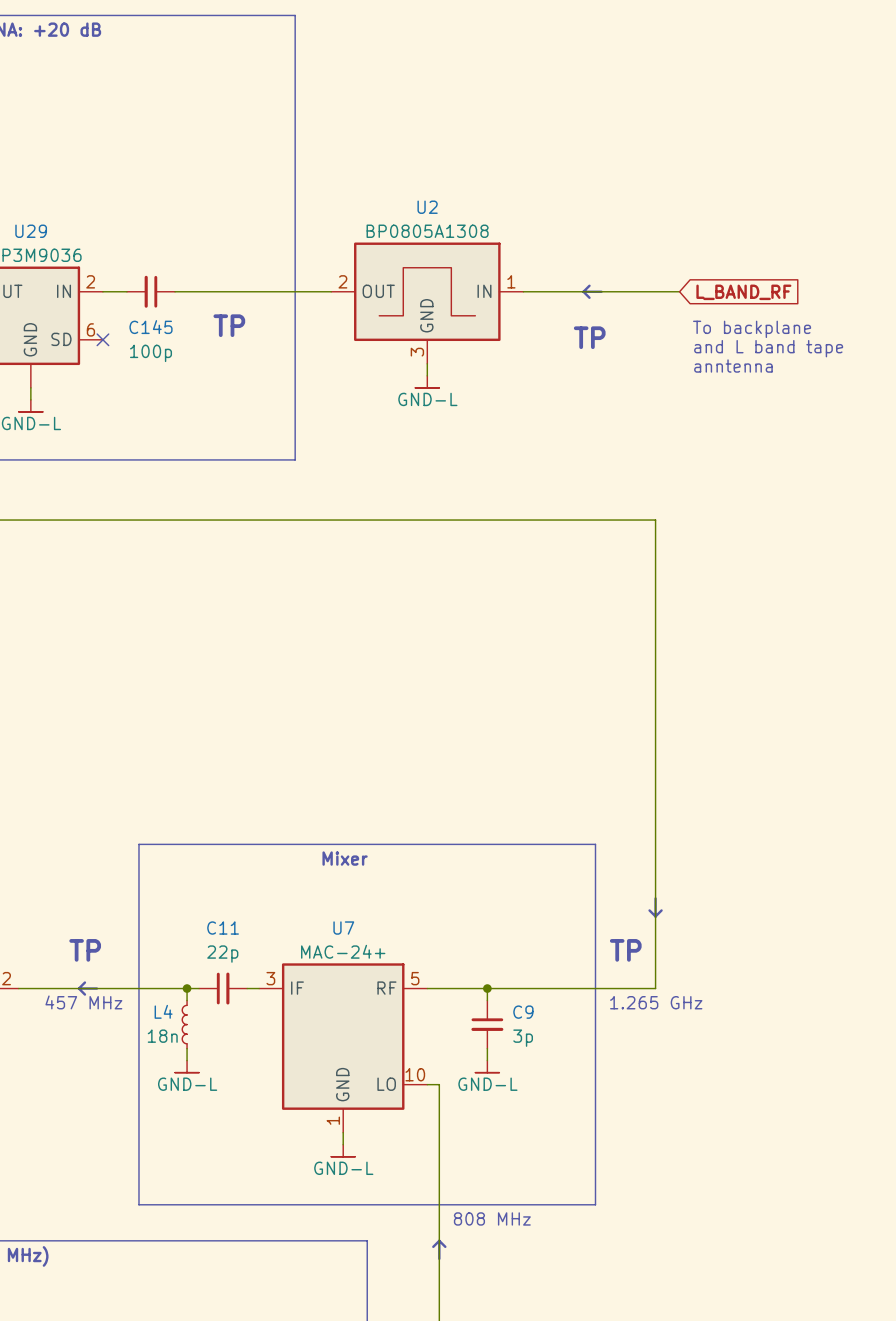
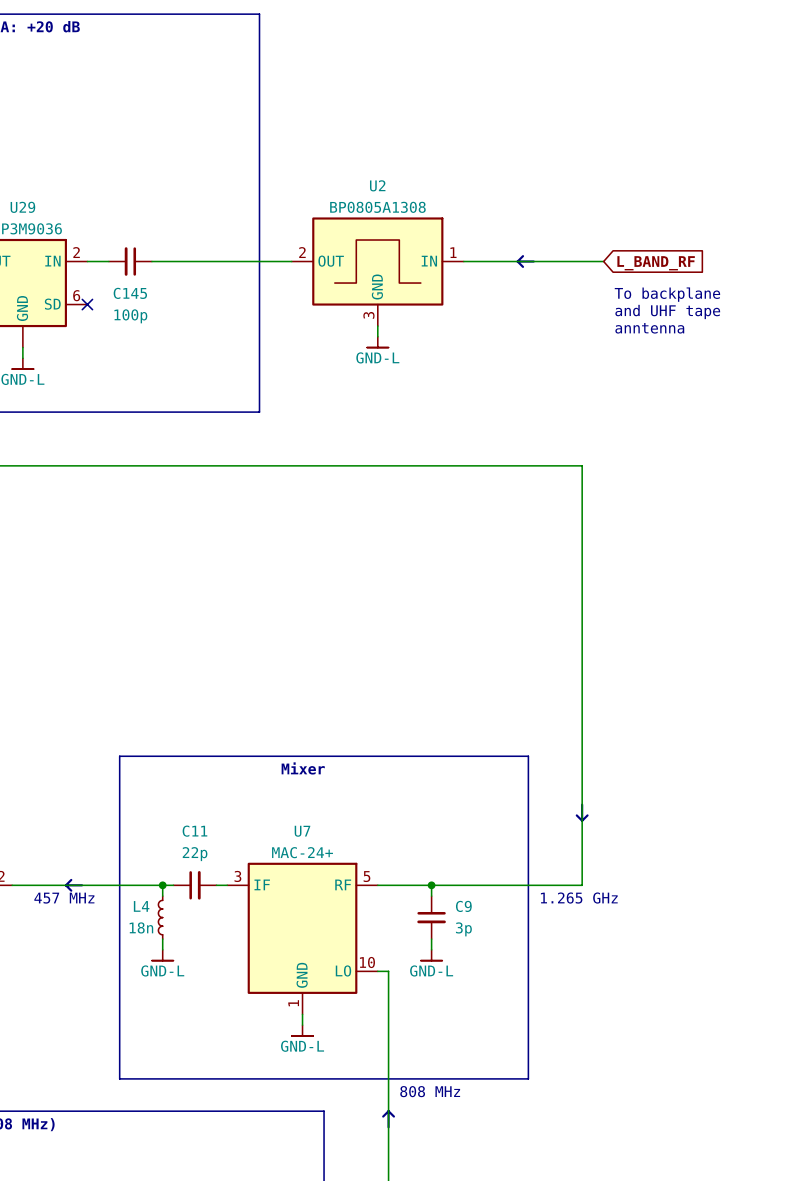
text: TP (229, 325) -> none
text: TP (589, 337) -> none
text: and L band tape (768, 348) -> and UHF tape (667, 311)
text: TP (85, 950) -> none
text: TP (625, 950) -> none

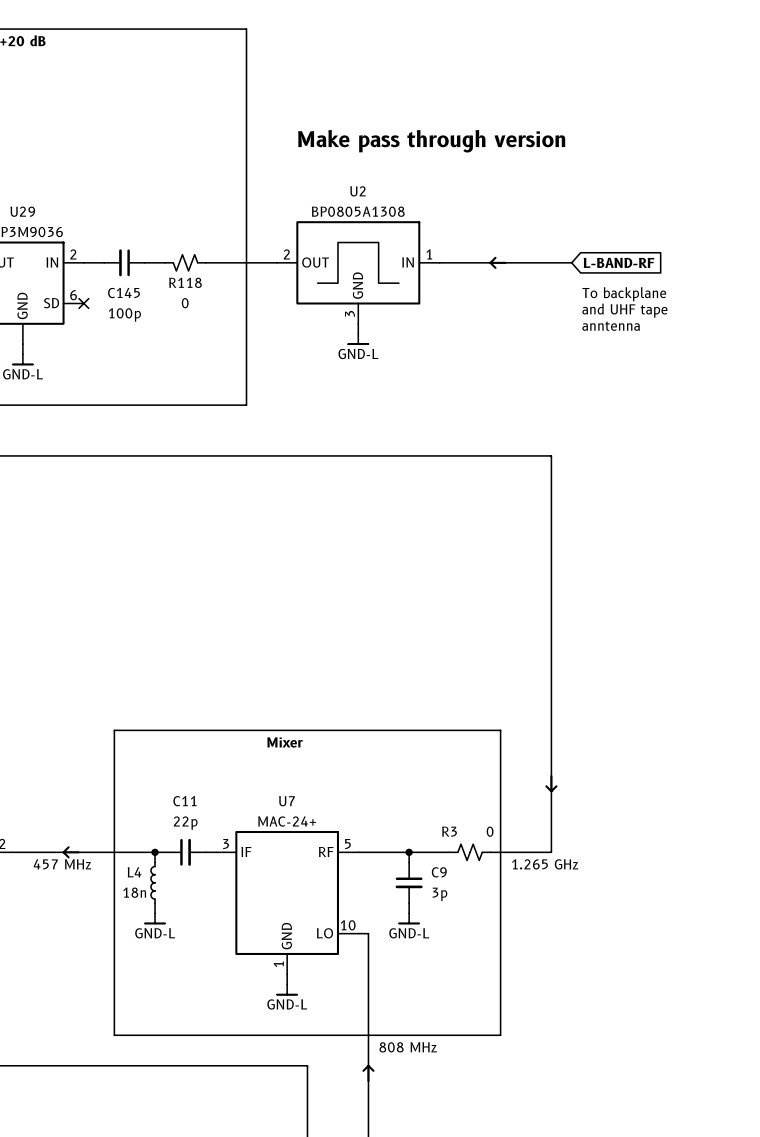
text: none -> Make pass through version (431, 141)
R118: none -> 0 (185, 262)
global label: L_BAND_RF (656, 263) -> L-BAND-RF (619, 262)
R3: none -> 0 (470, 852)

